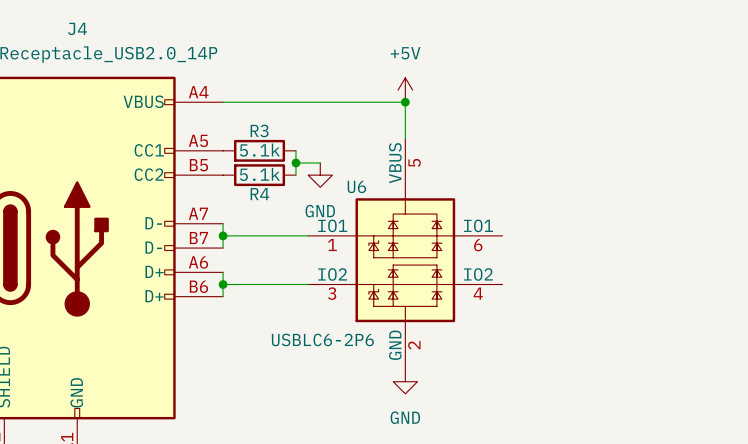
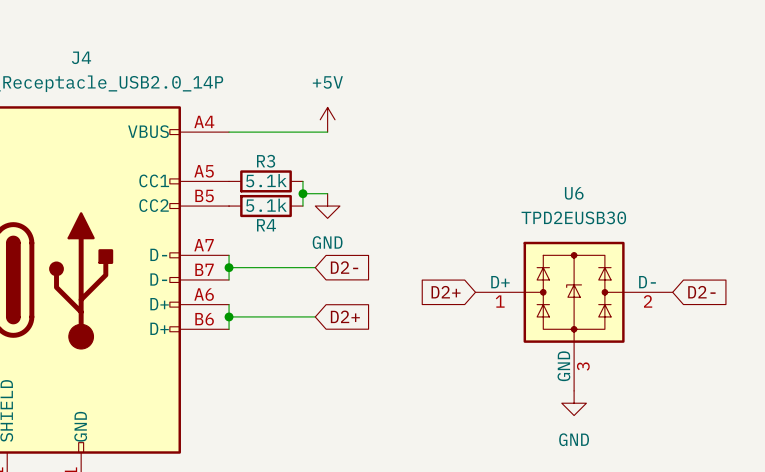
power symbol position: +5V (405, 90) -> +5V (327, 119)
wire: (320, 102) (405, 102) (405, 138) -> none
junction: (405, 102) -> none
U6 symbol: [308, 138, 503, 370] -> [475, 241, 673, 391]
U6 name position: U6 (356, 186) -> U6 (574, 193)
global label: none -> D2- (344, 267)
global label: none -> D2+ (446, 292)
global label: none -> D2- (701, 292)
global label: none -> D2+ (345, 316)
U6 value: USBLC6-2P6 (322, 339) -> TPD2EUSB30 (573, 217)
power symbol position: GND (405, 381) -> GND (574, 403)

